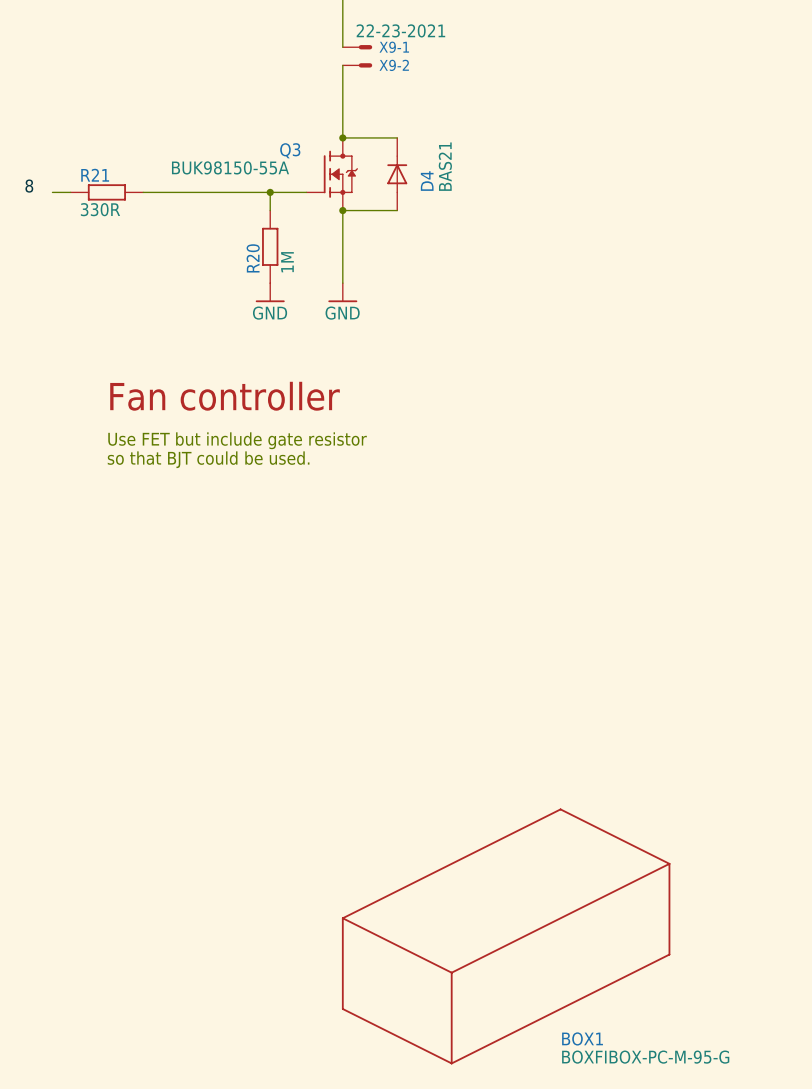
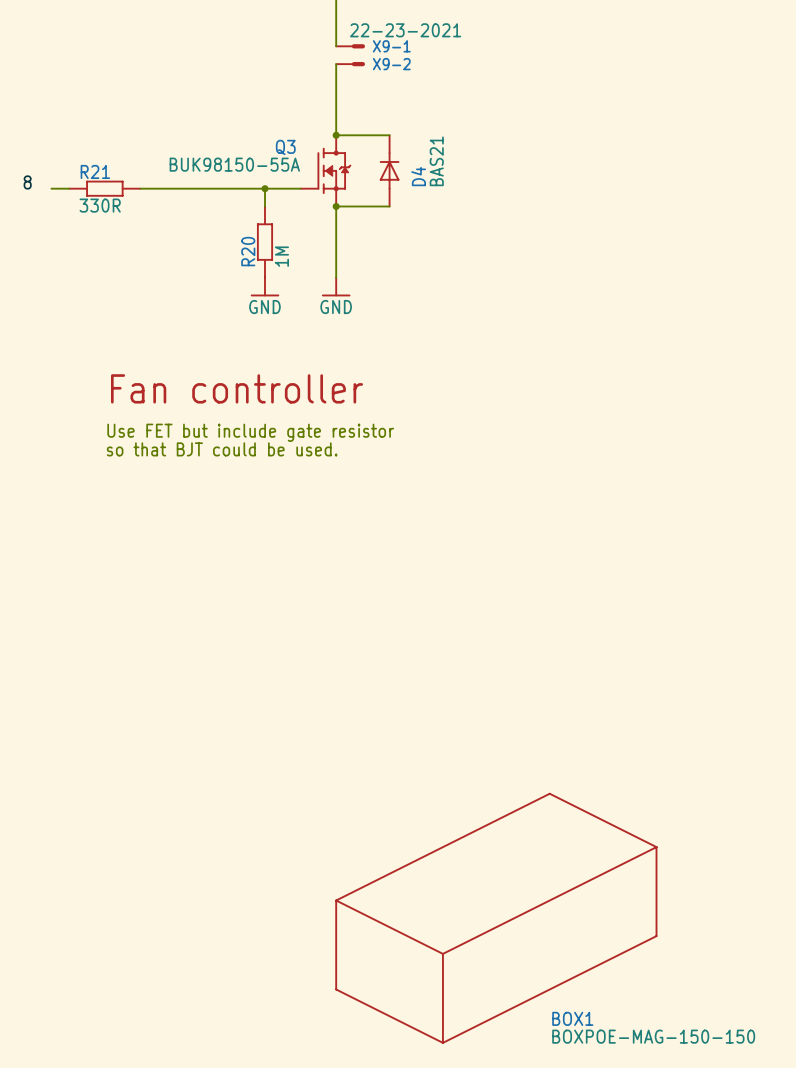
BOX1 value: BOXFIBOX-PC-M-95-G (645, 1057) -> BOXPOE-MAG-150-150 (653, 1036)

